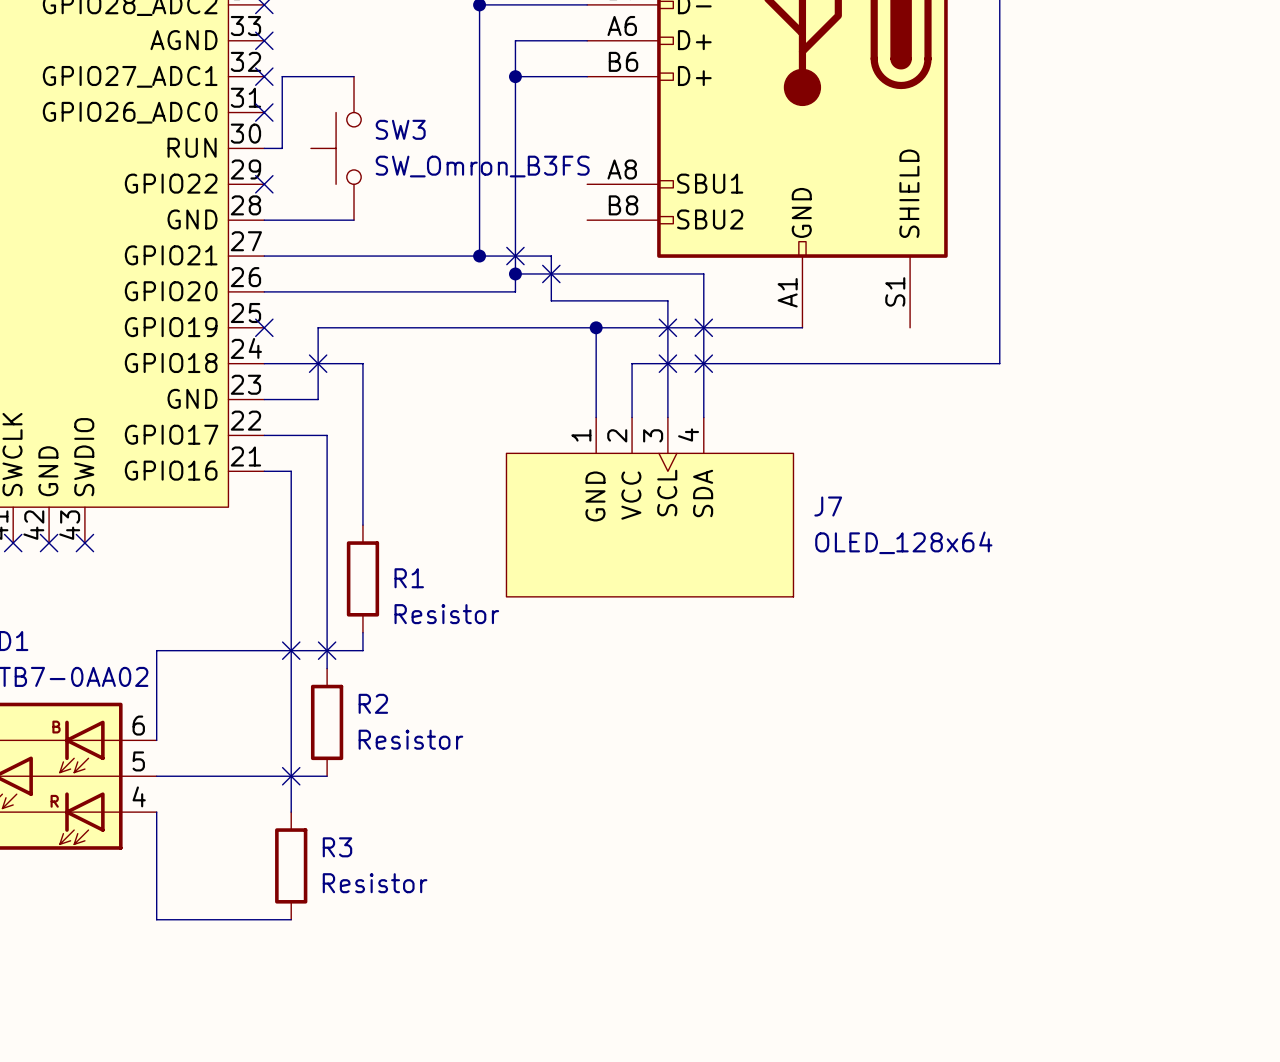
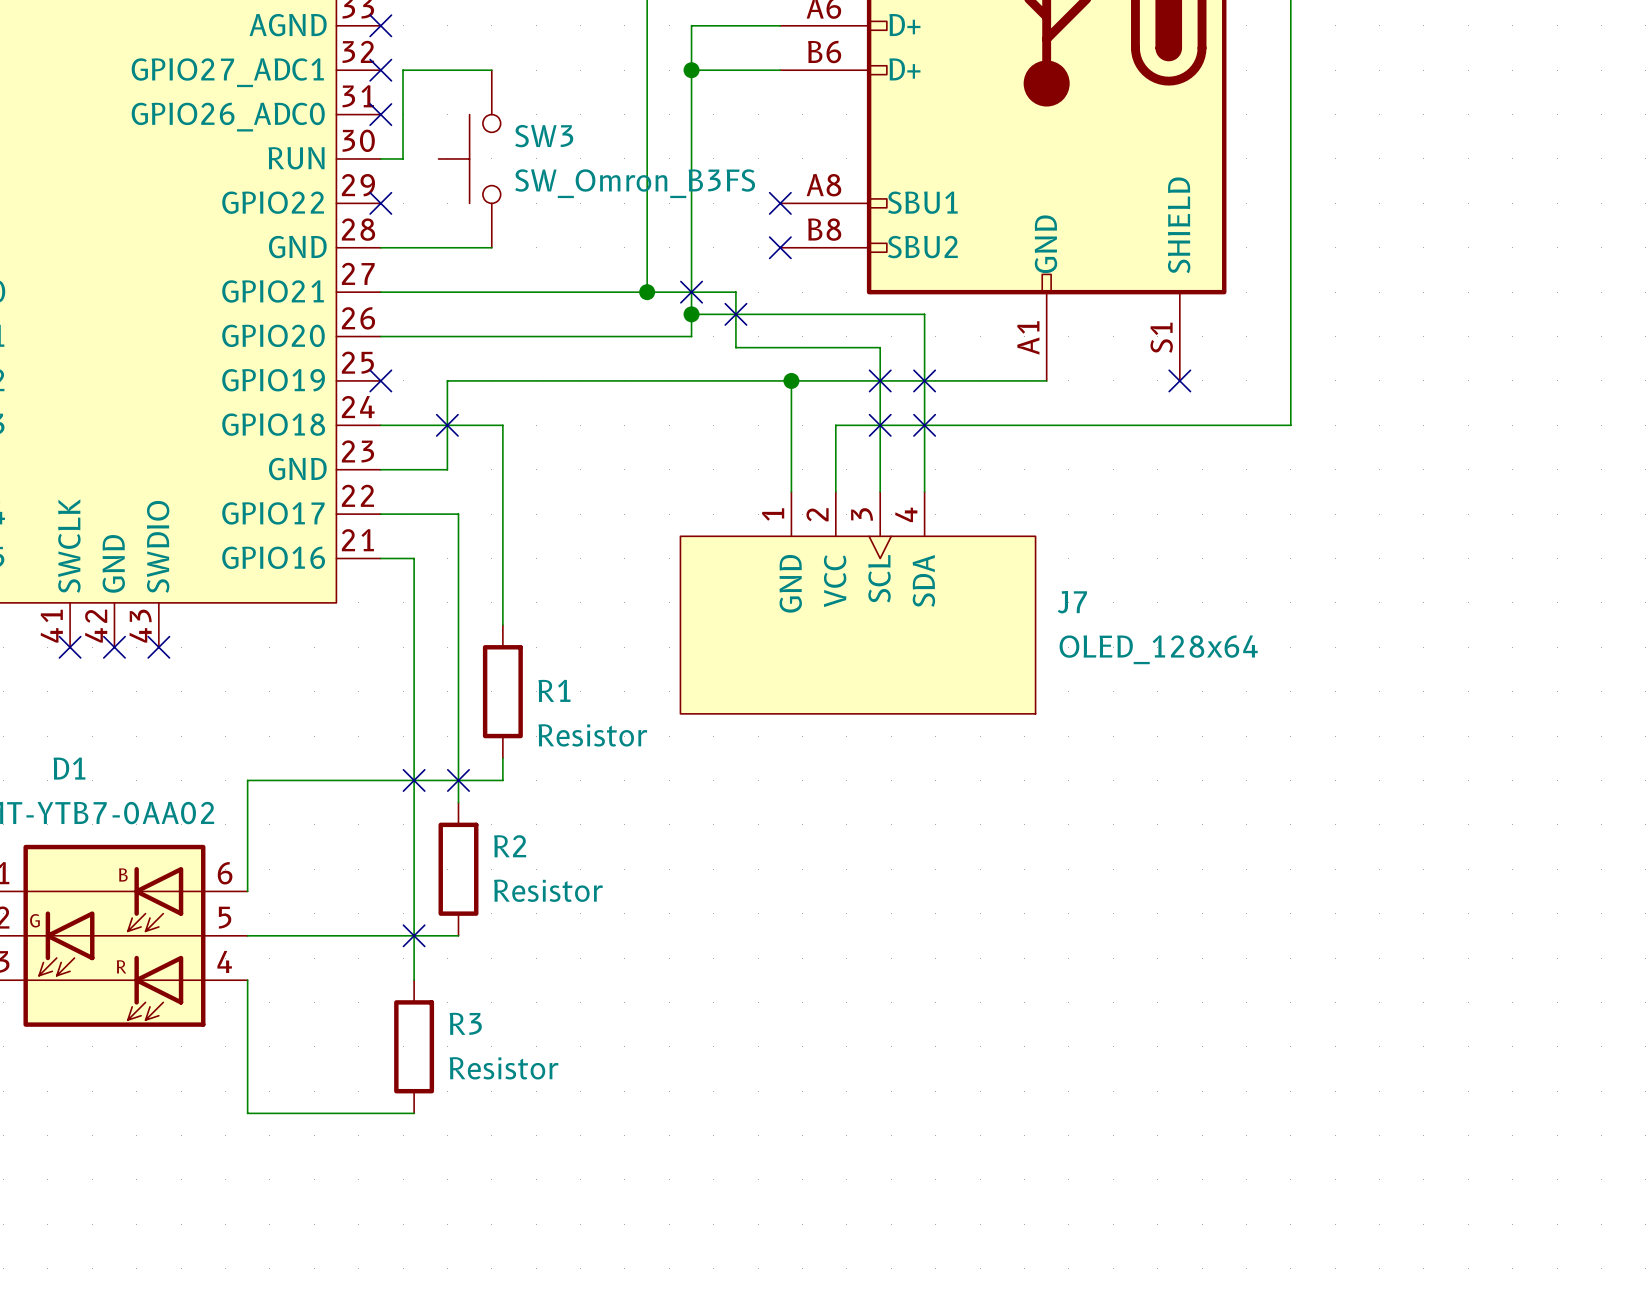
no-connect mark: none -> (780, 203)
no-connect mark: none -> (780, 247)
no-connect mark: none -> (1179, 380)

